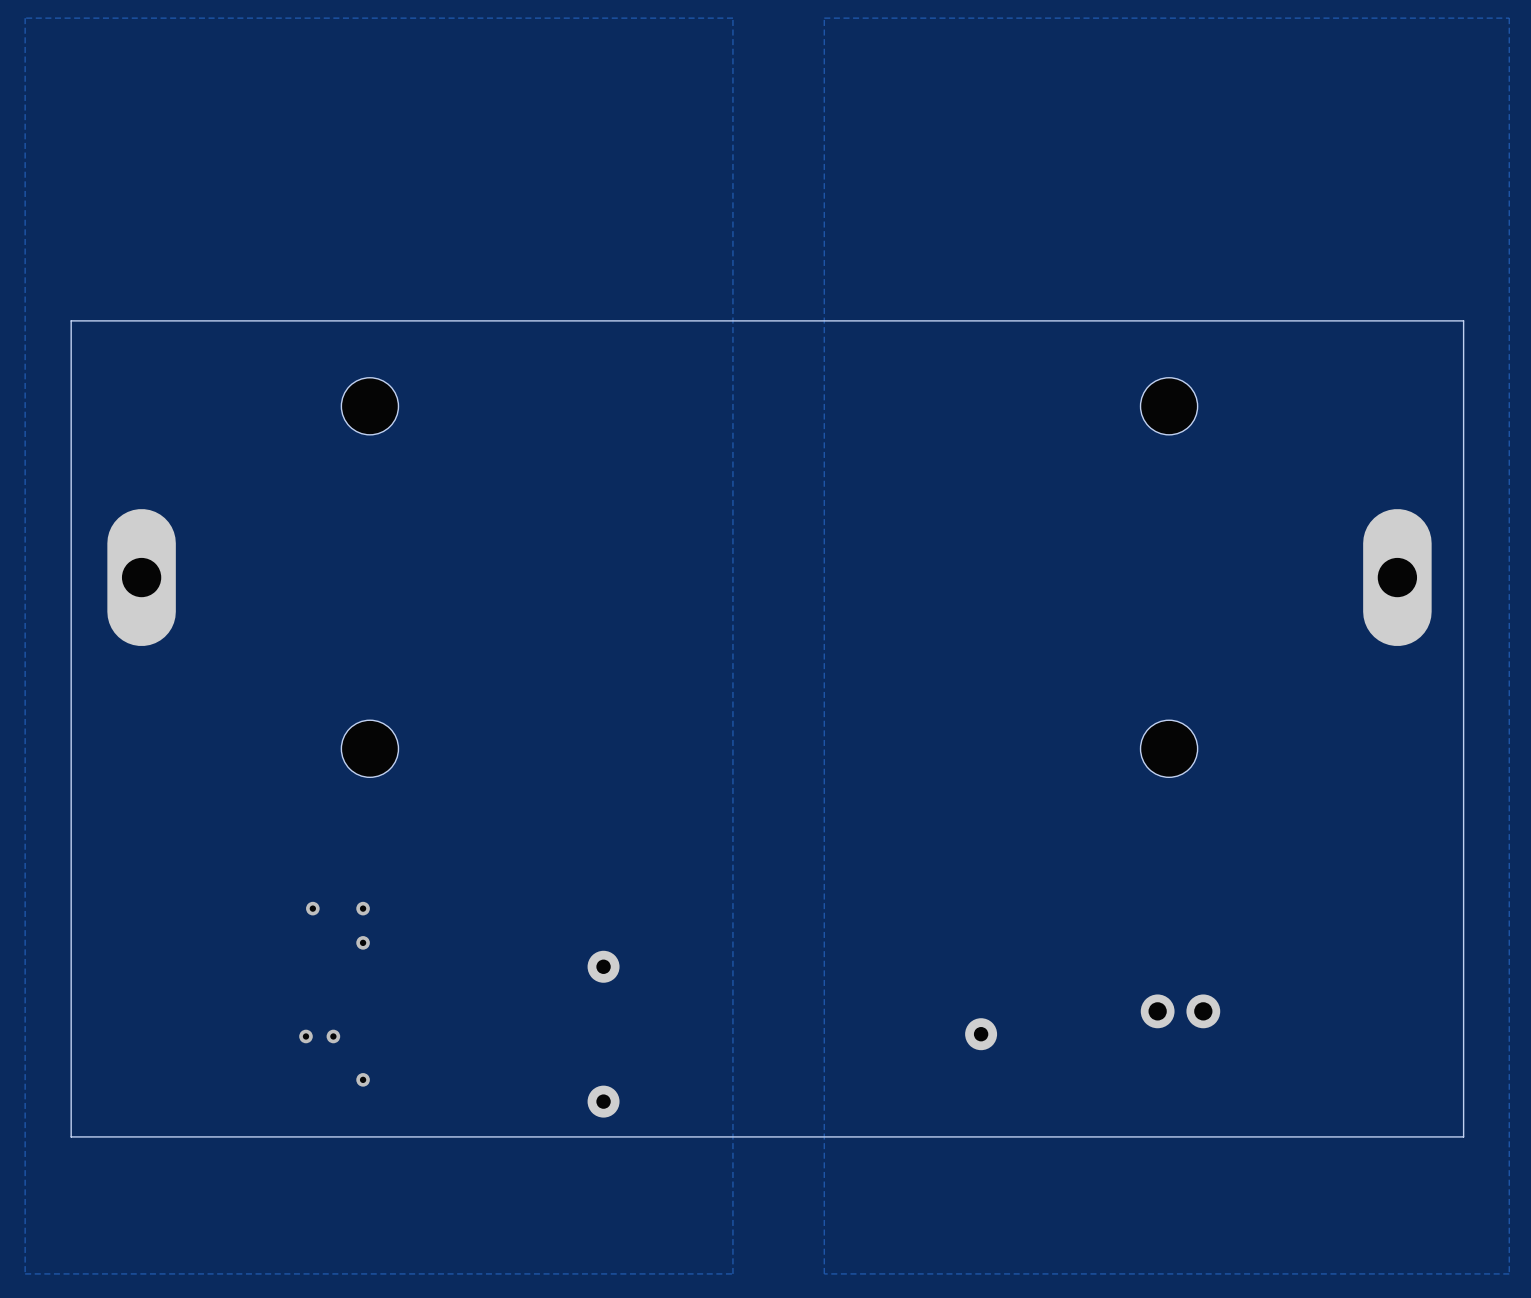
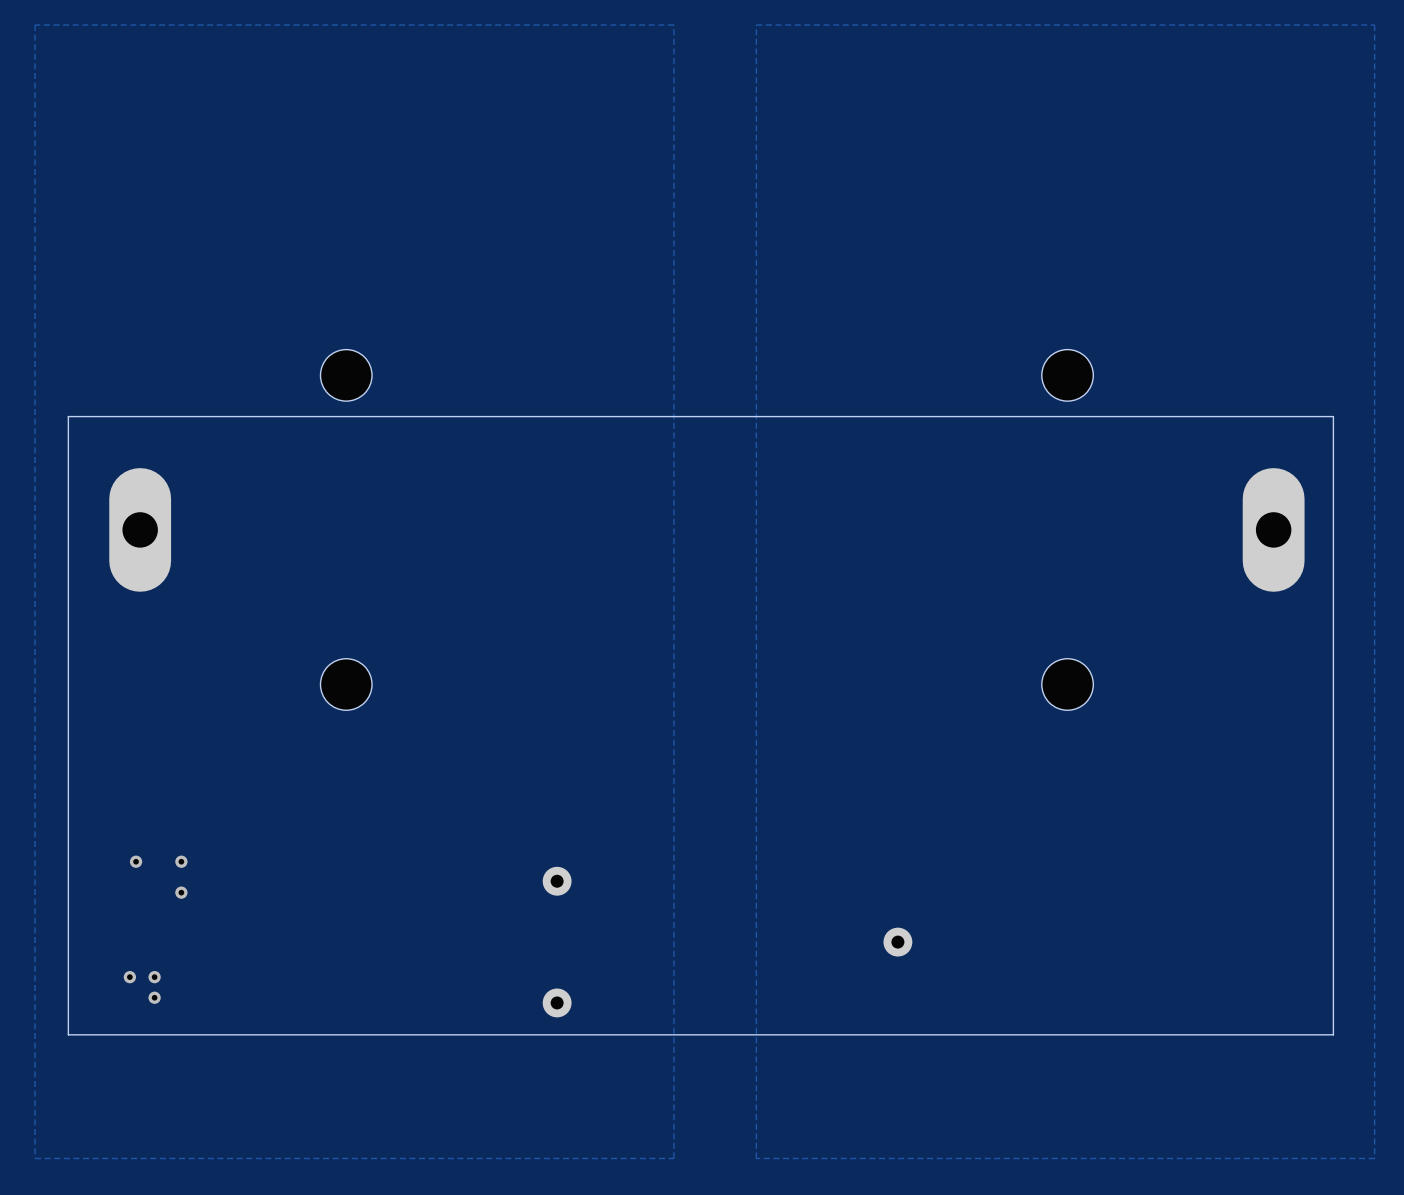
board edge: (1463, 451) (1463, 320) (71, 320) (71, 1136) -> (1333, 416) (68, 416) (68, 1034) (76, 1034)
via: (312, 908) -> none
via: (363, 908) -> none
via: (363, 942) -> none
via: none -> (136, 861)
via: none -> (181, 861)
via: none -> (181, 892)
part: (1180, 1011) -> none
via: (305, 1036) -> none
via: (333, 1036) -> none
via: none -> (129, 977)
via: none -> (154, 977)
via: (363, 1079) -> none
via: none -> (154, 997)

